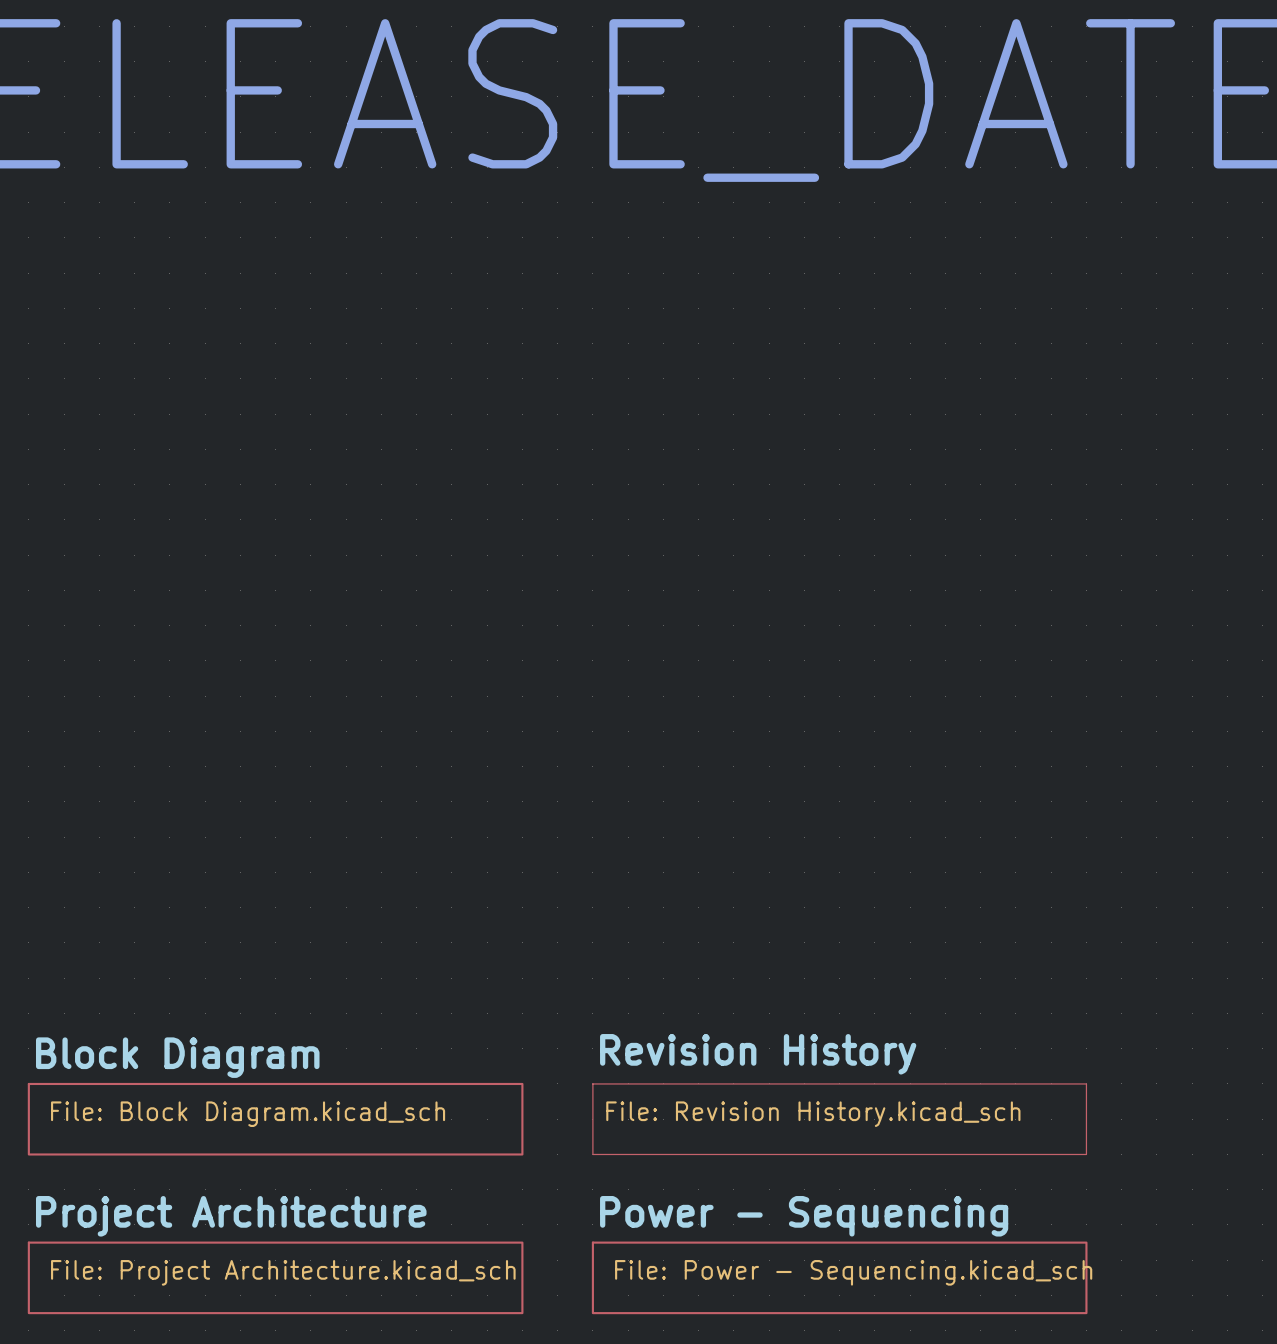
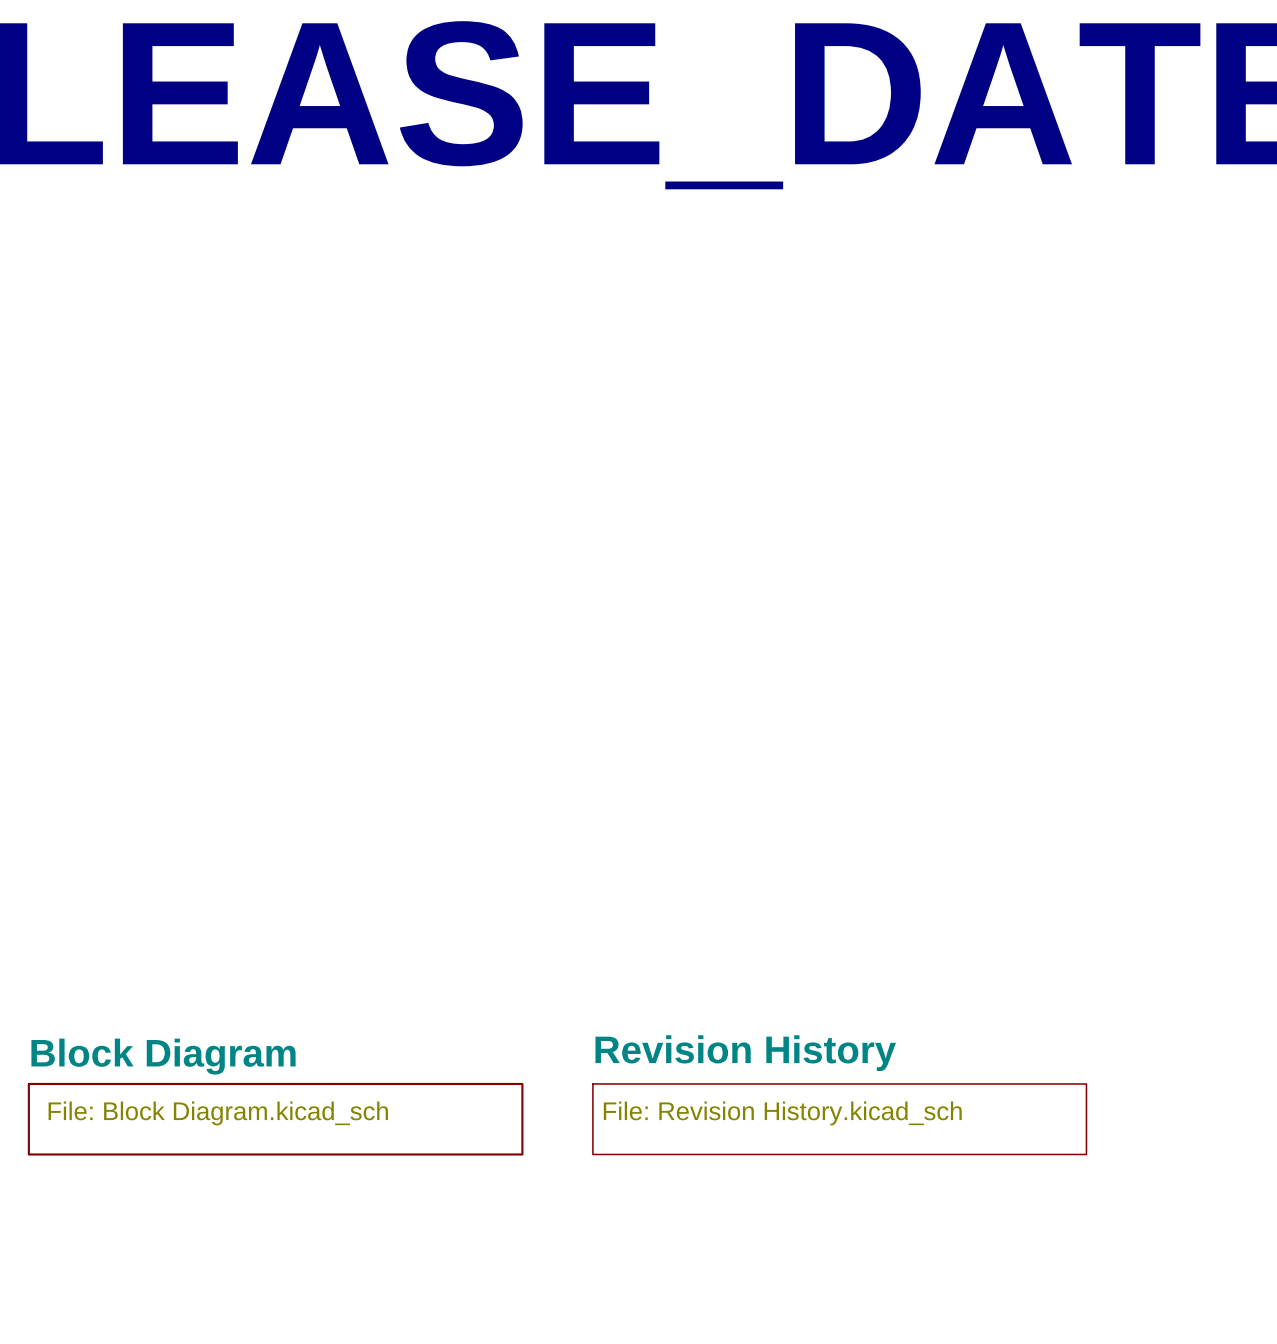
sheet Project Architecture: File: Project Architecture.kicad_sch (275, 1277) -> none
sheet Power - Sequencing: File: Power - Sequencing.kicad_sch (839, 1277) -> none

